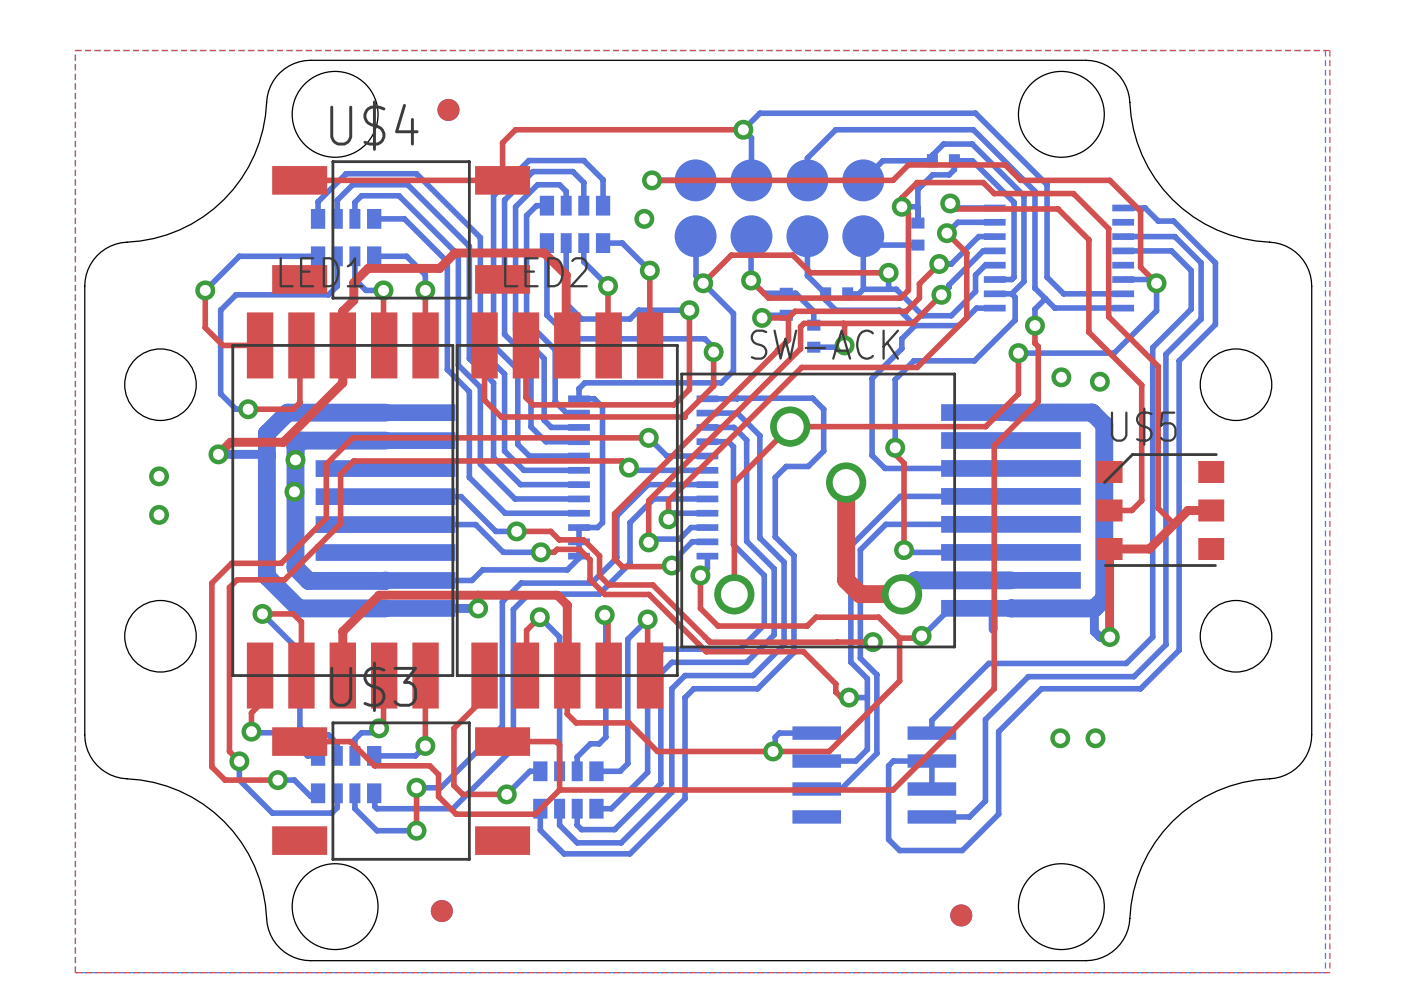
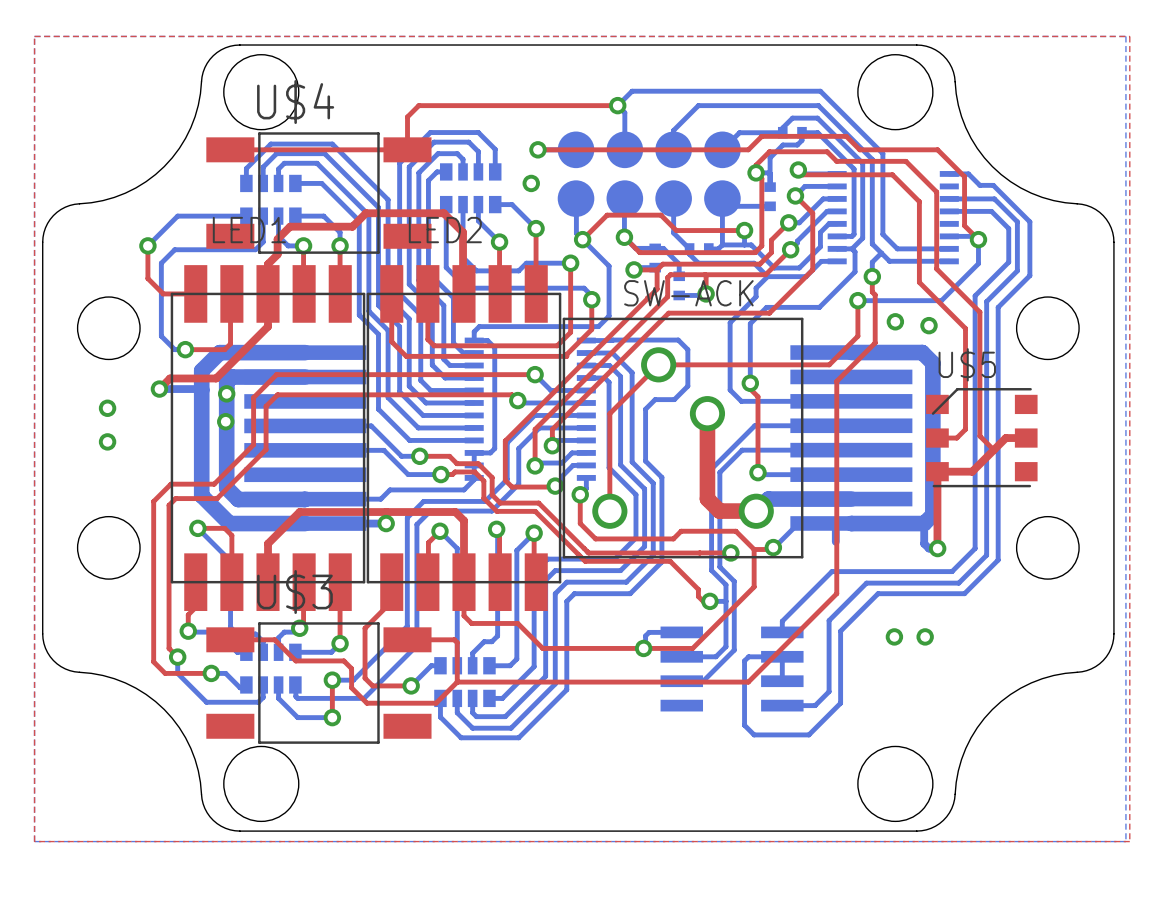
part: (448, 109) -> none
part: (441, 911) -> none
part: (961, 915) -> none

